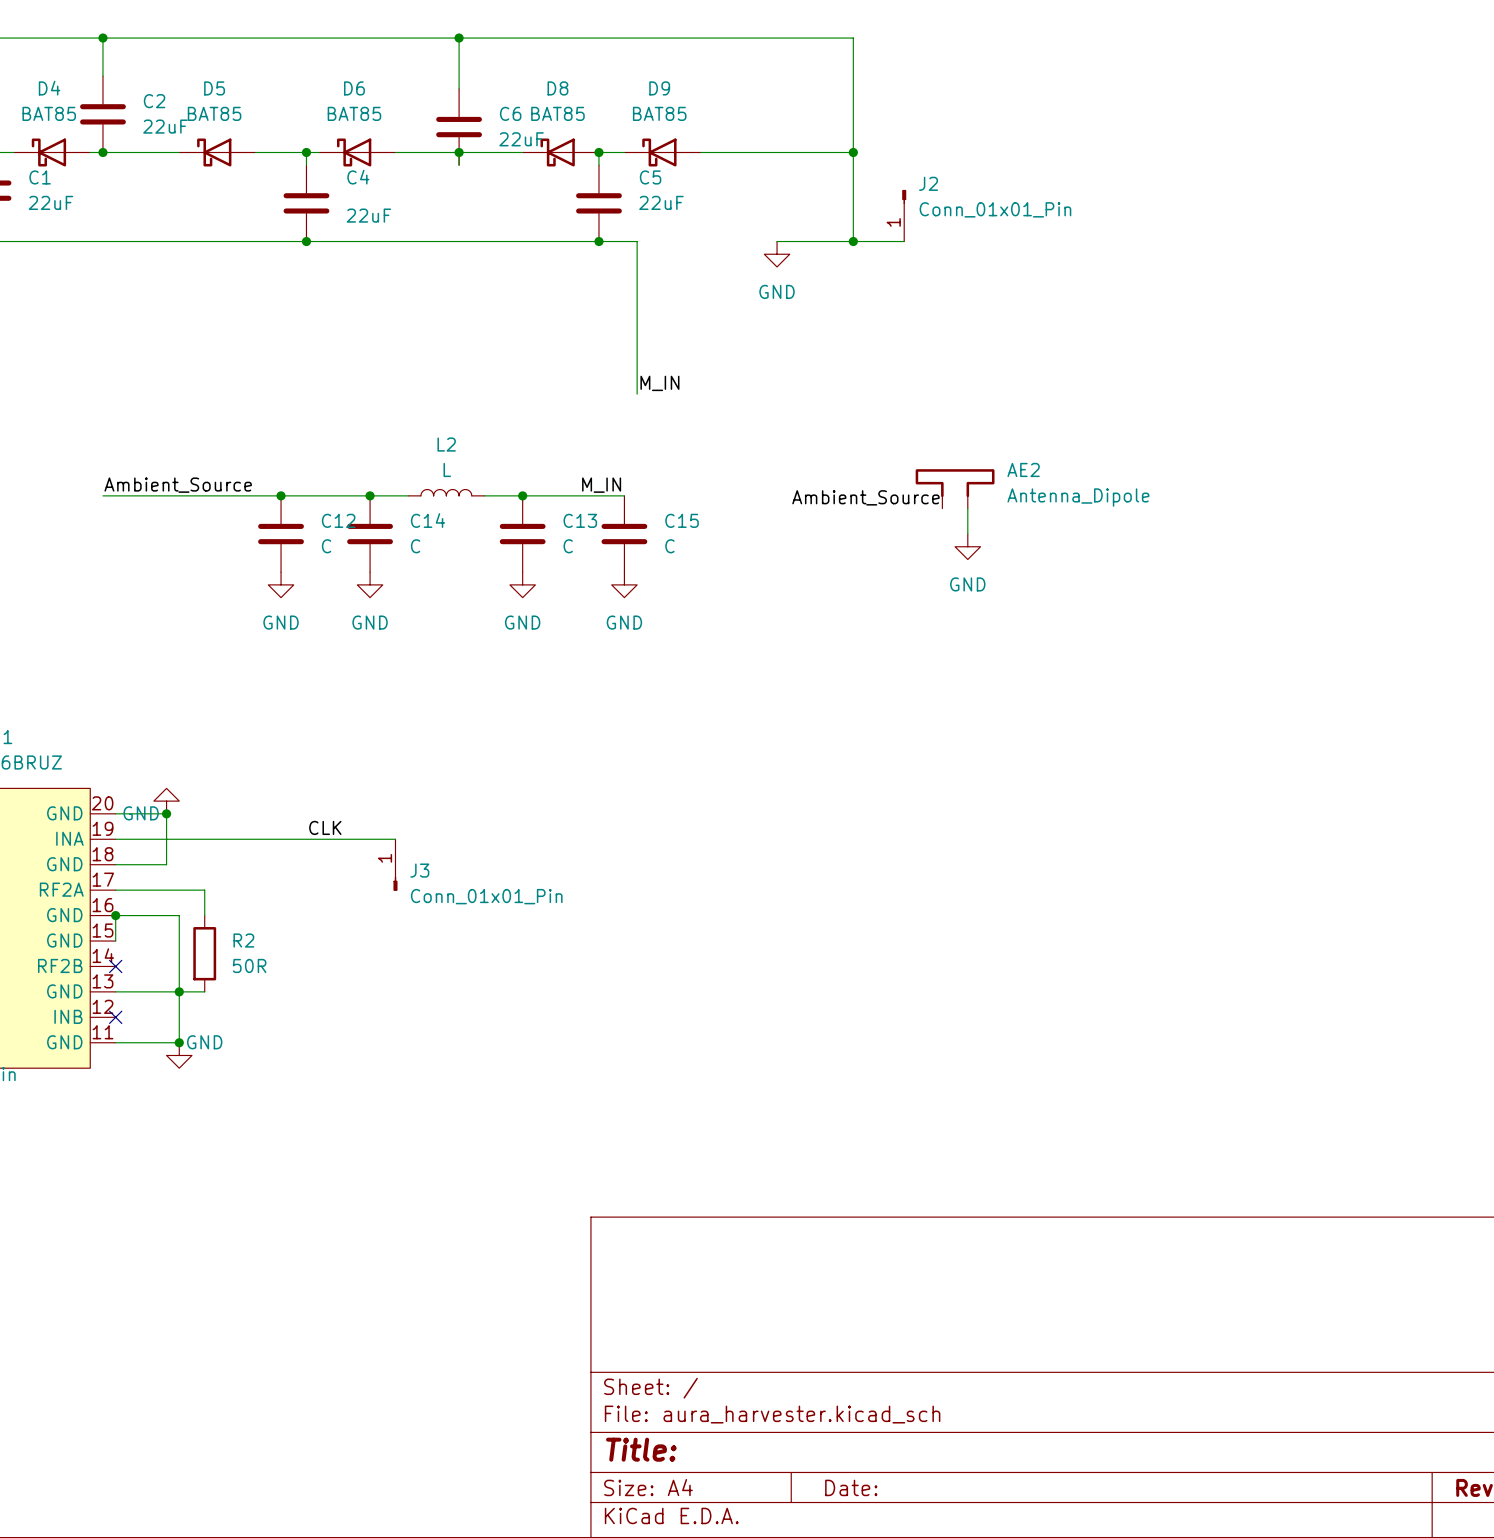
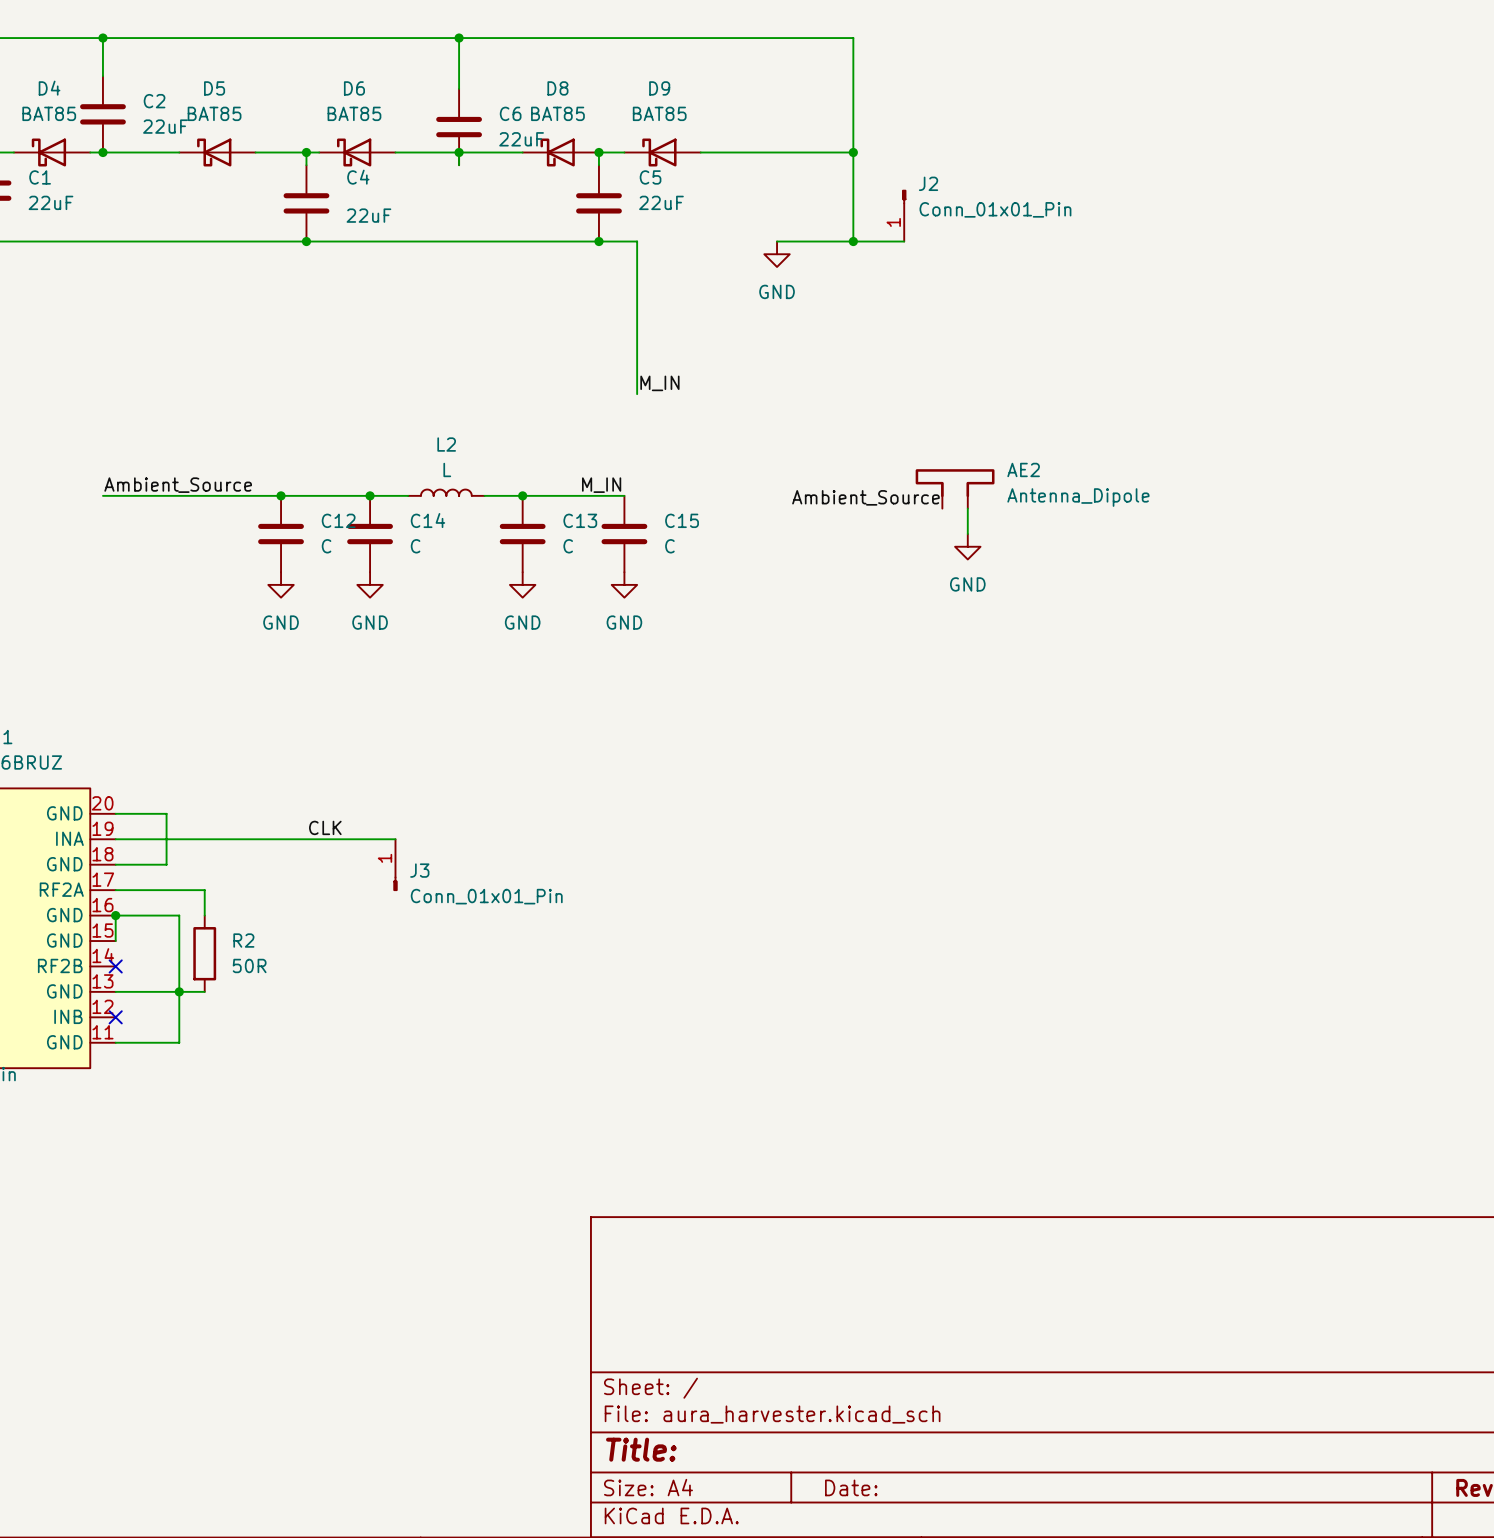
power symbol: GND (166, 801) -> none
junction: (166, 813) -> none
junction: (179, 1042) -> none
power symbol: GND (179, 1055) -> none

